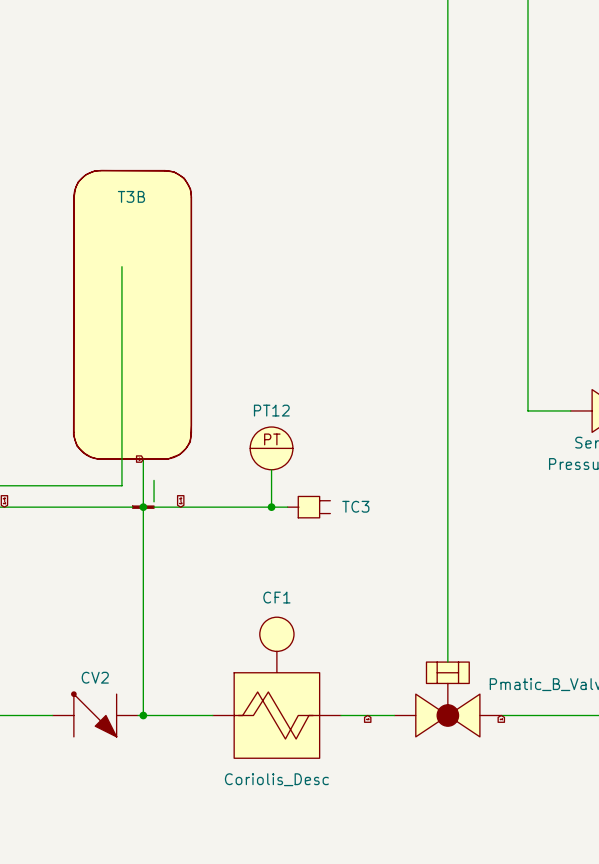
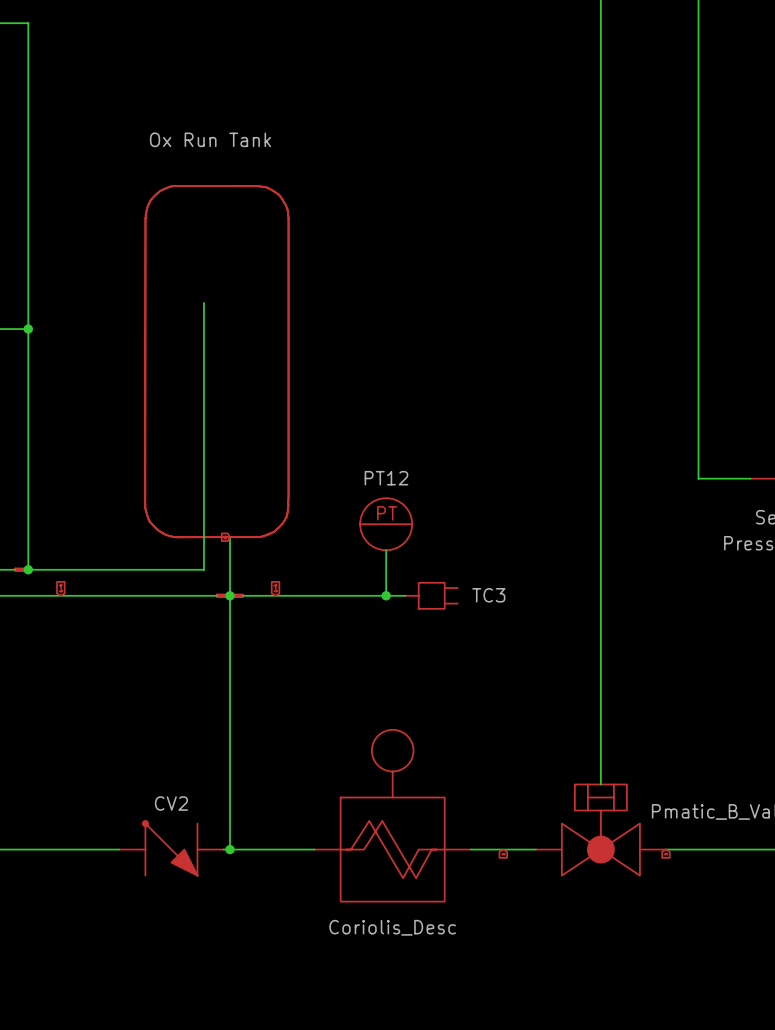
T3B text: none -> Ox Run Tank (210, 139)
T3B name: T3B (131, 196) -> none
wire: (154, 480) (154, 501) -> none
CF1 name: CF1 (276, 597) -> none

